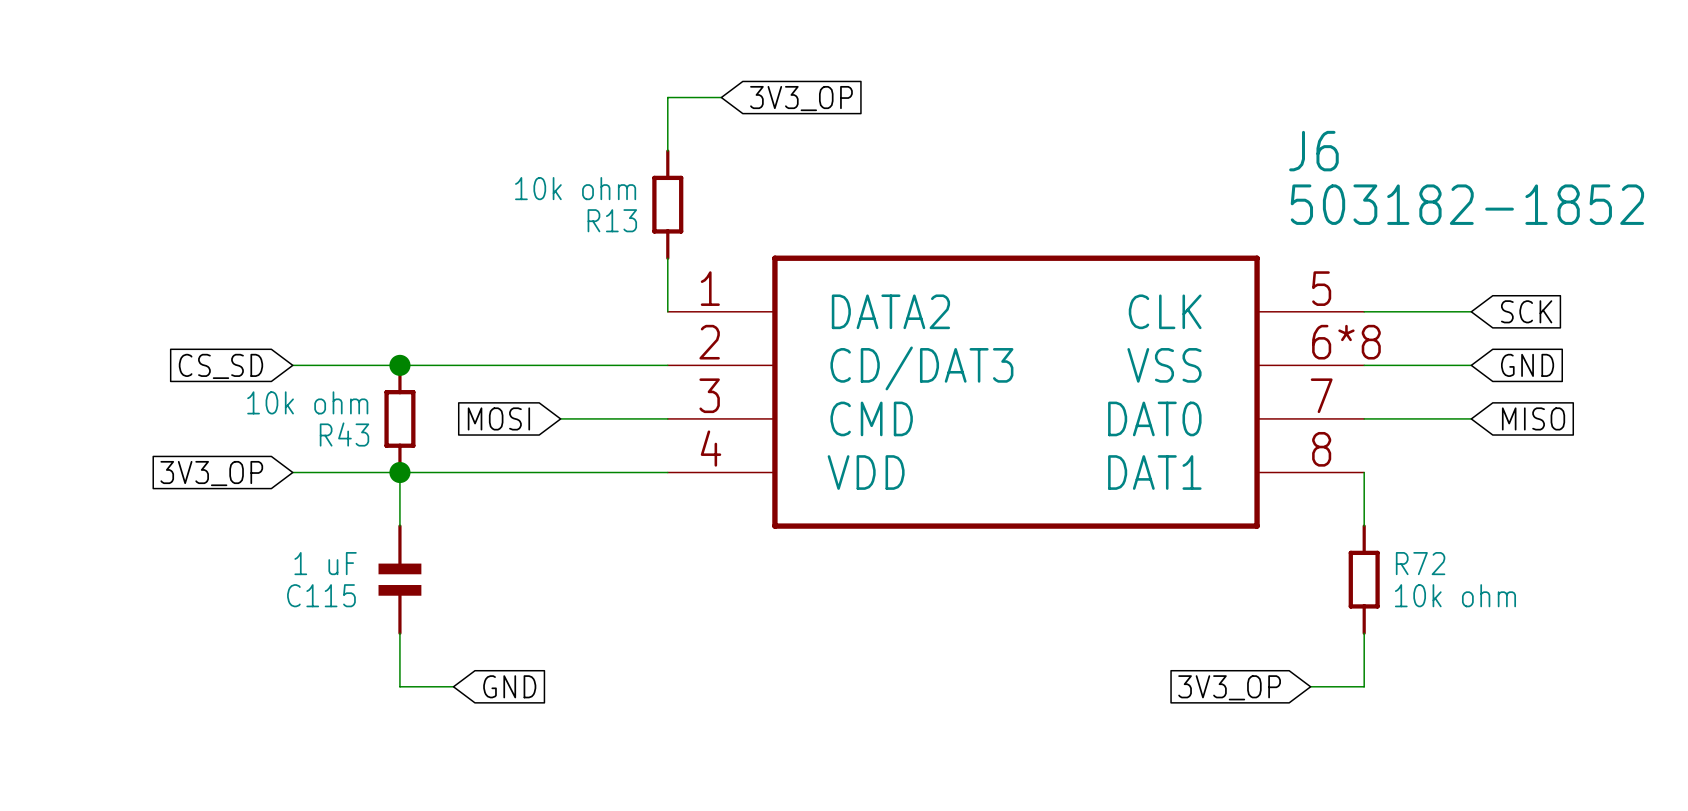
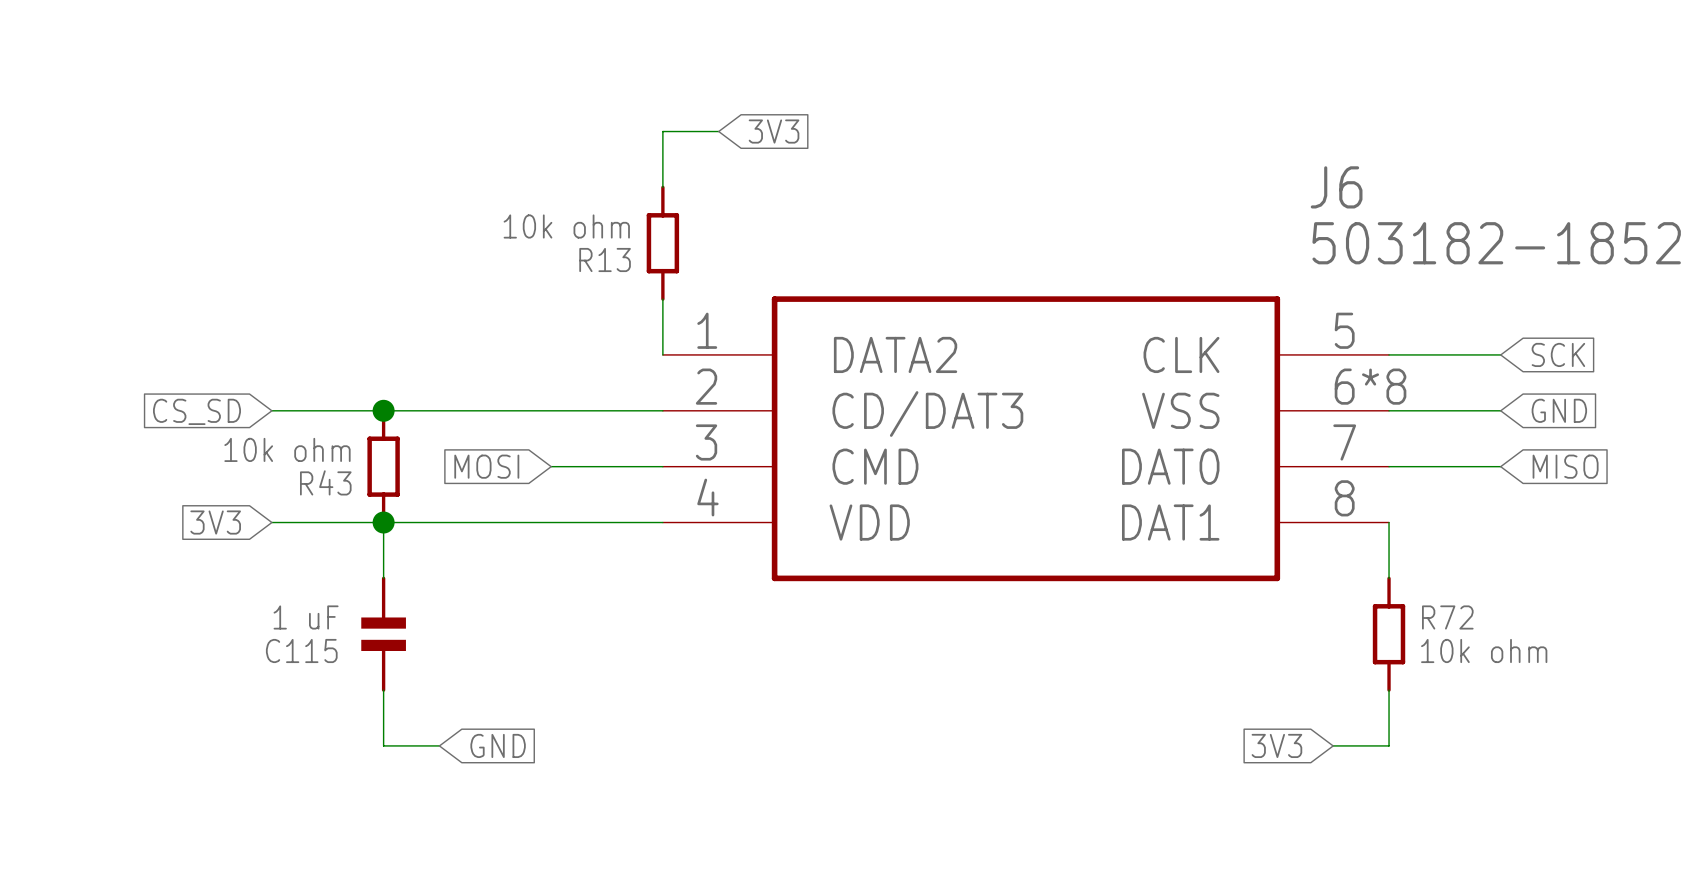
global label: 3V3_OP (801, 98) -> 3V3 (774, 131)
global label: 3V3_OP (211, 473) -> 3V3 (215, 522)
global label: 3V3_OP (1229, 687) -> 3V3 (1276, 745)

